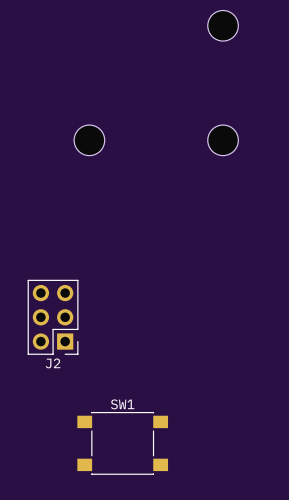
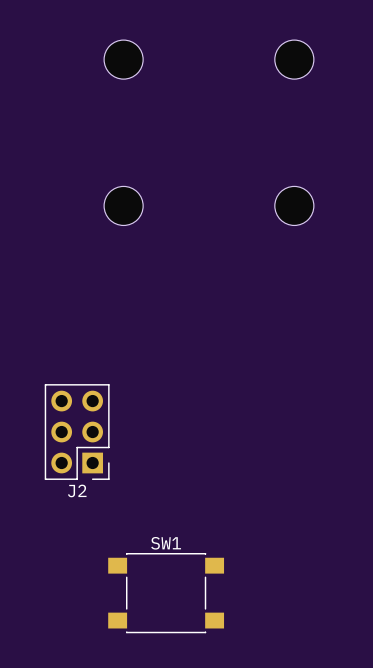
part: none -> (123, 59)

